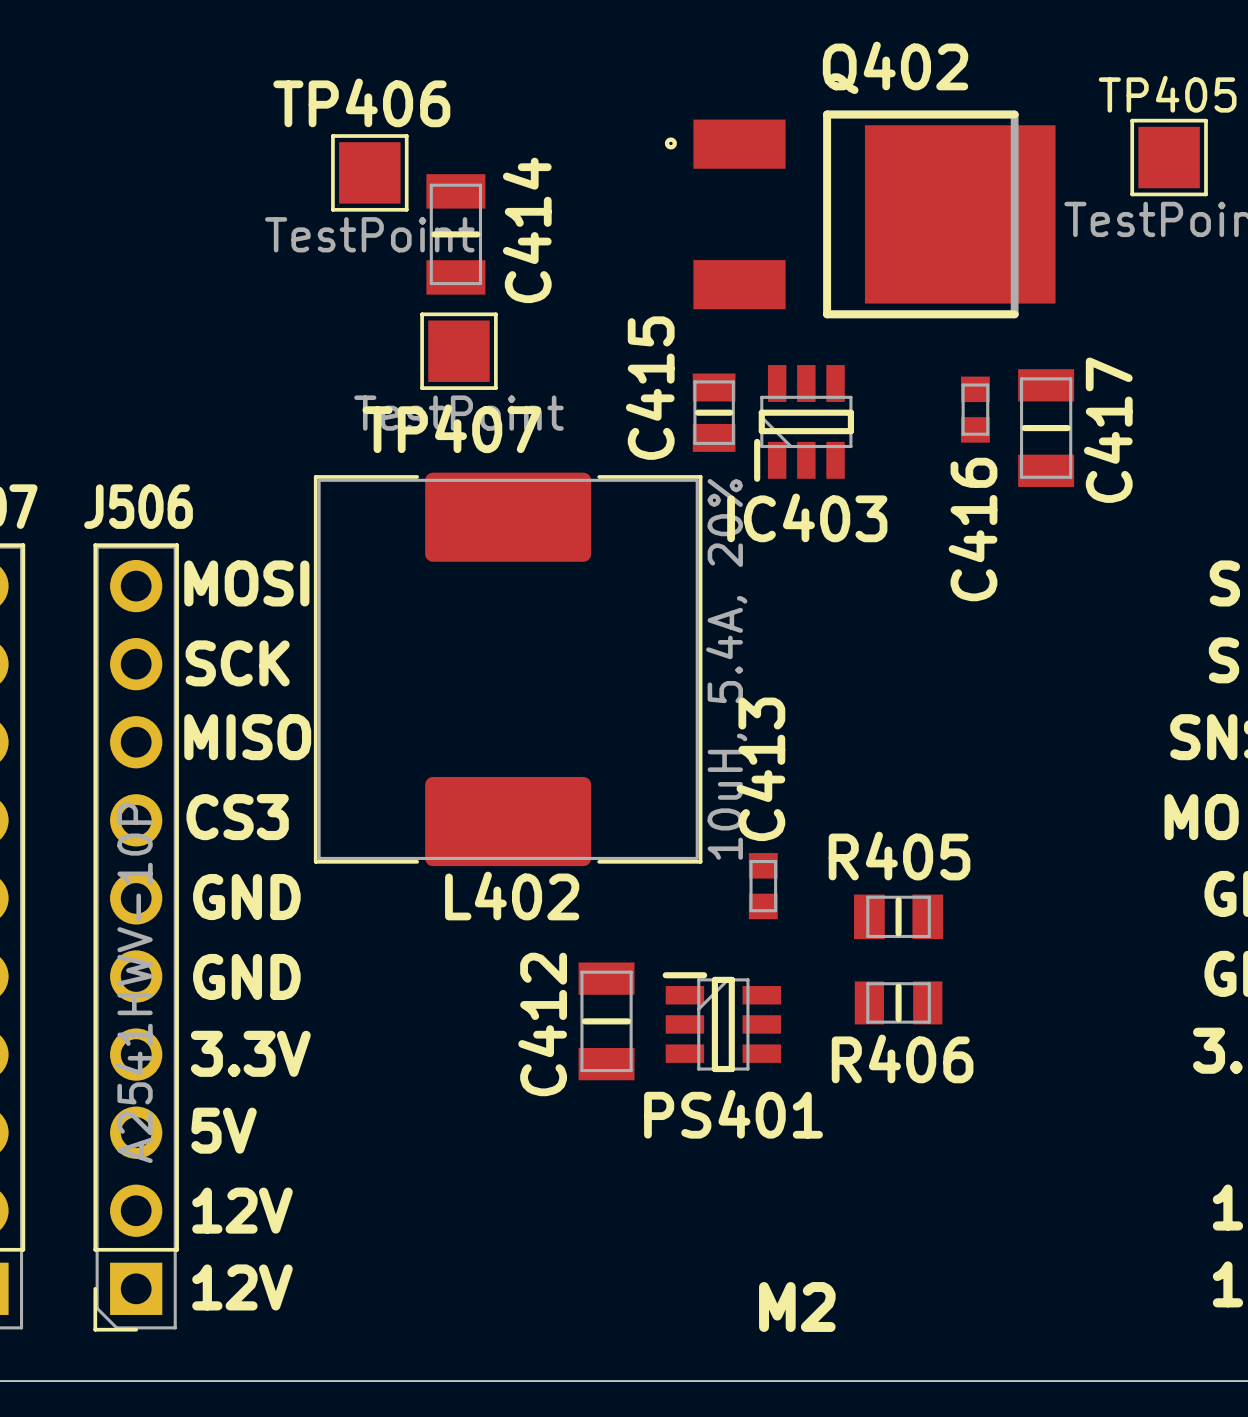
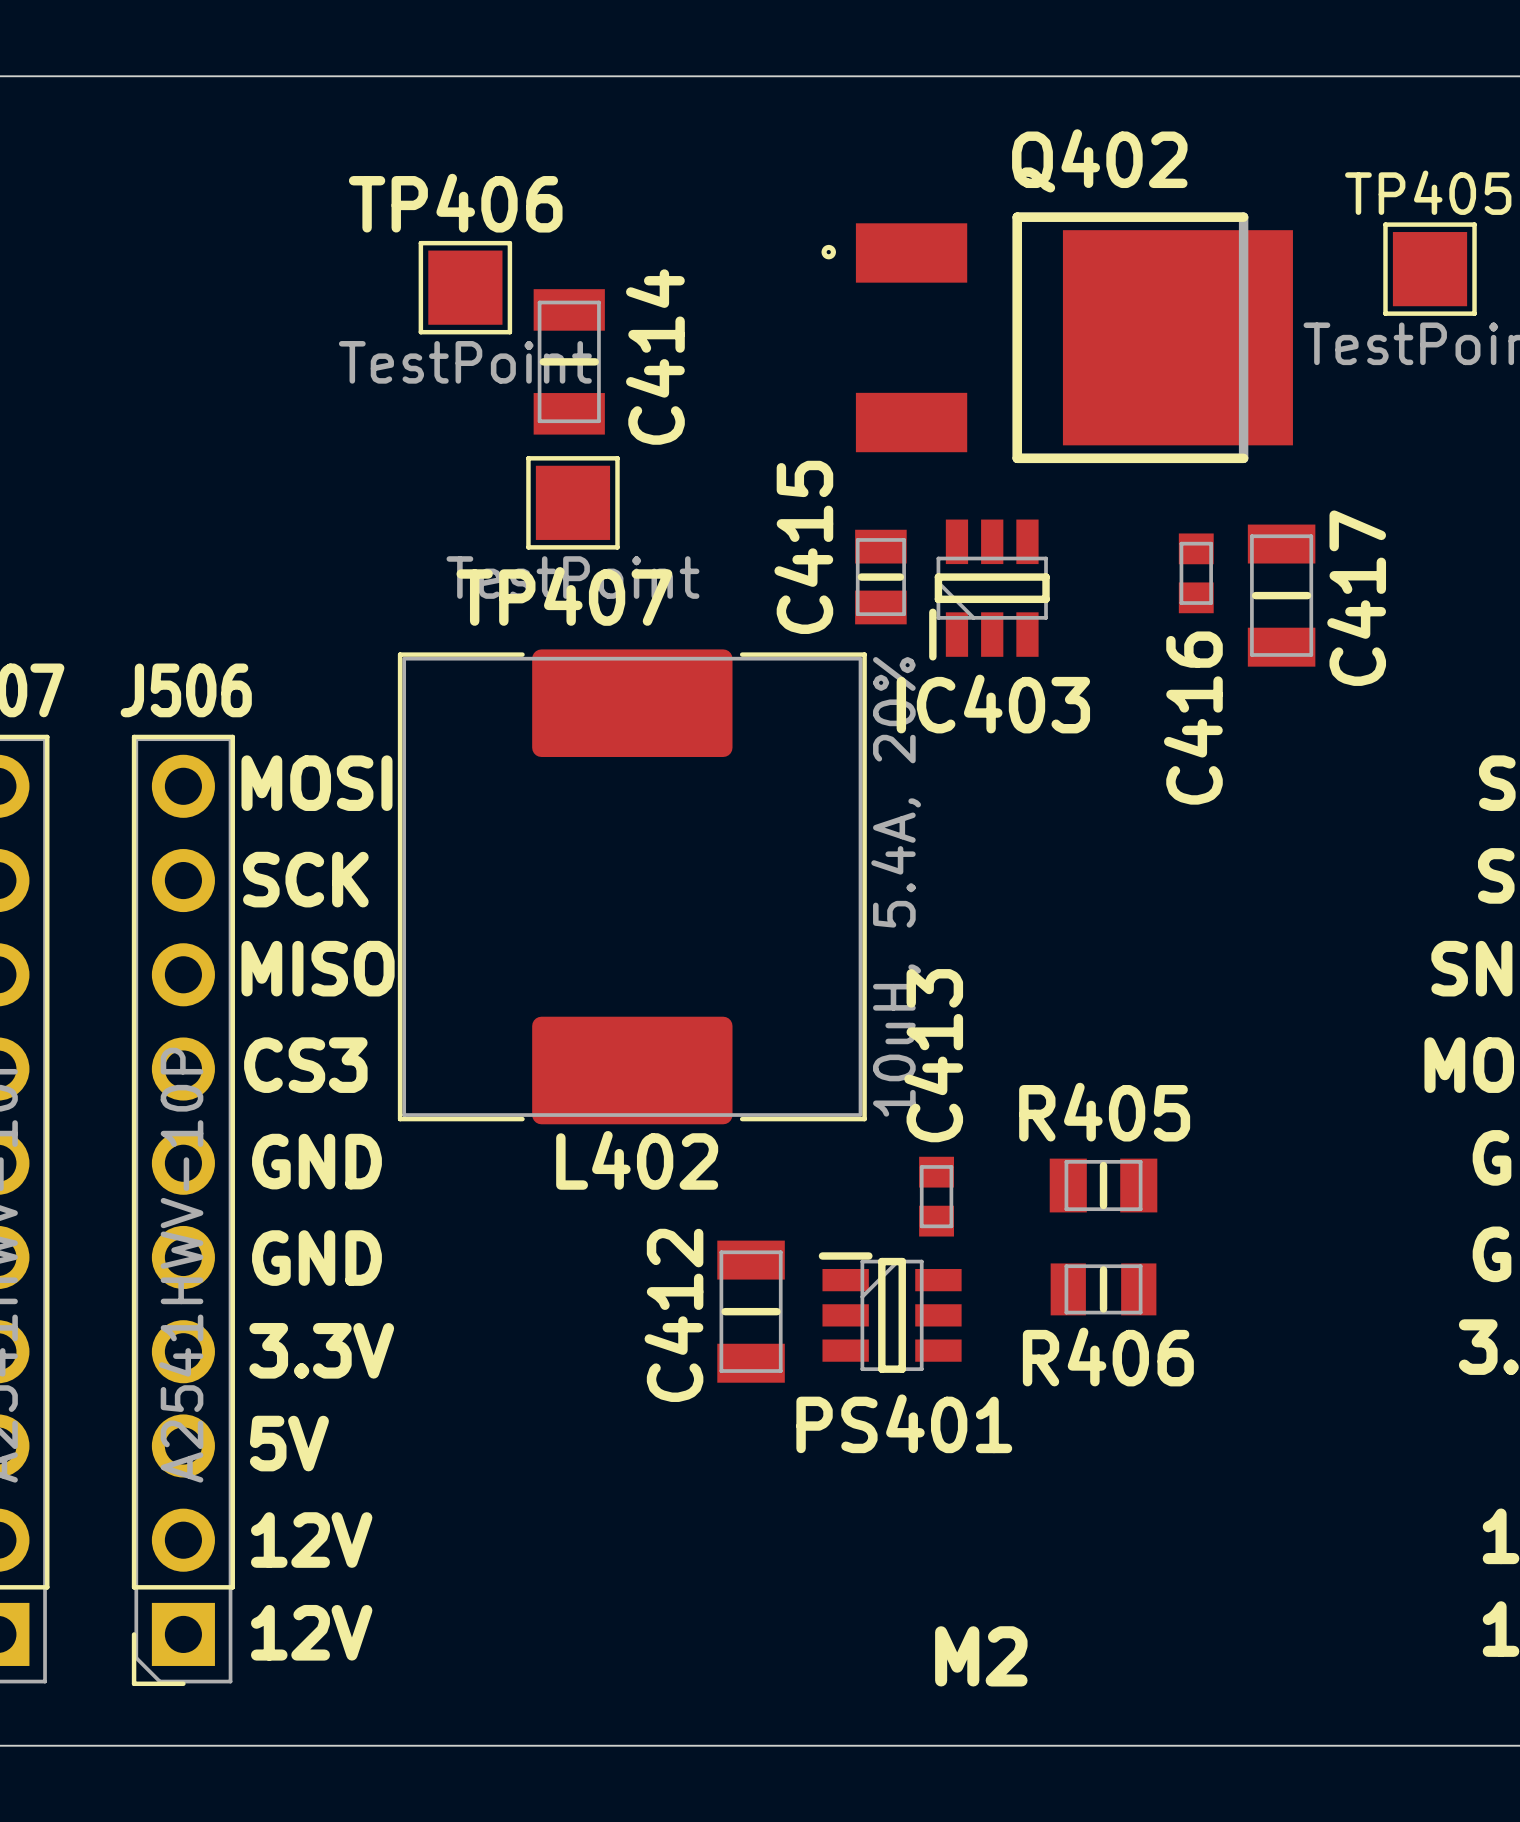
C413 position: (763, 886) -> (936, 1196)

